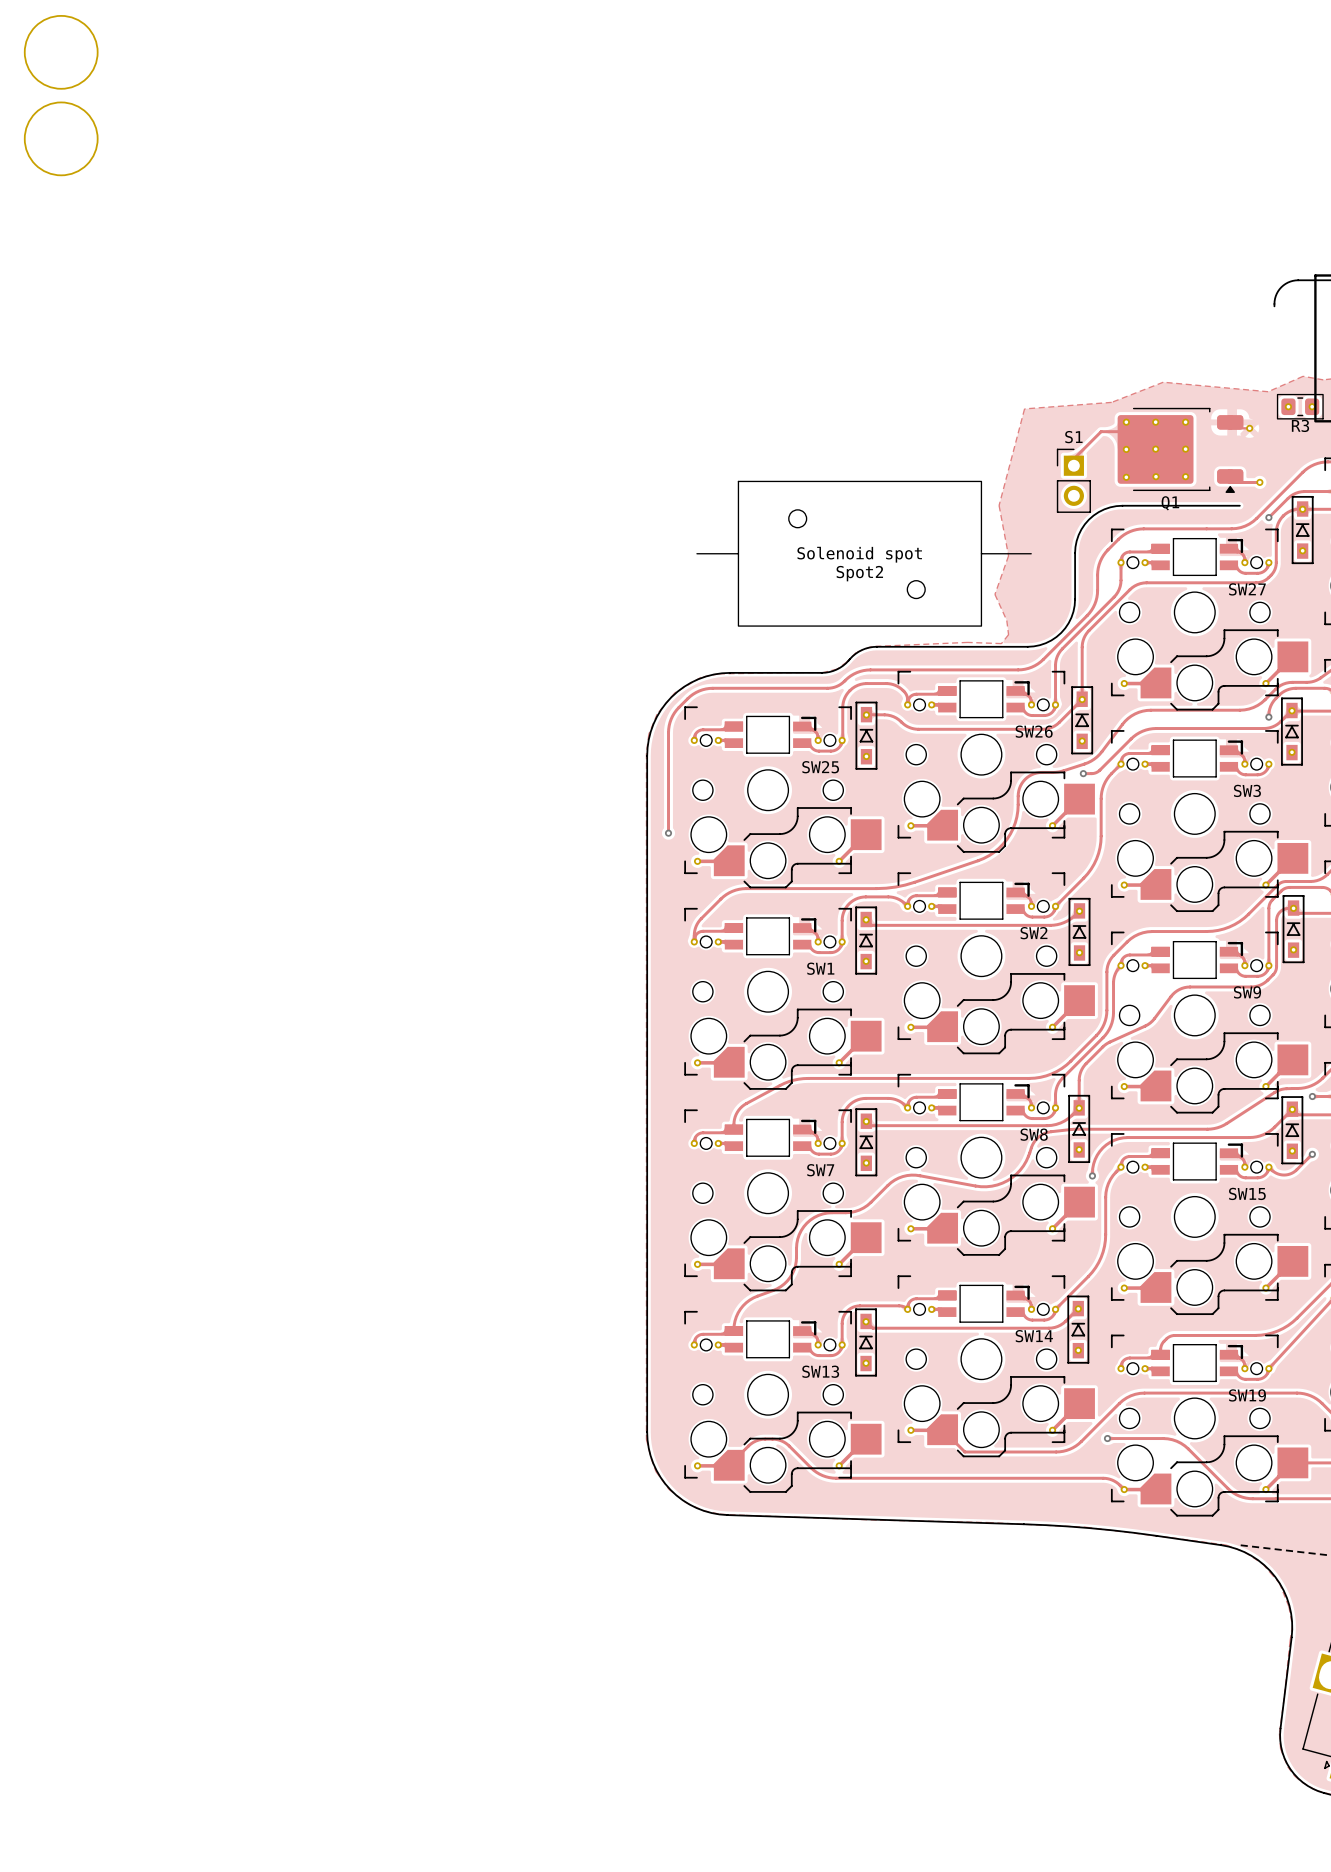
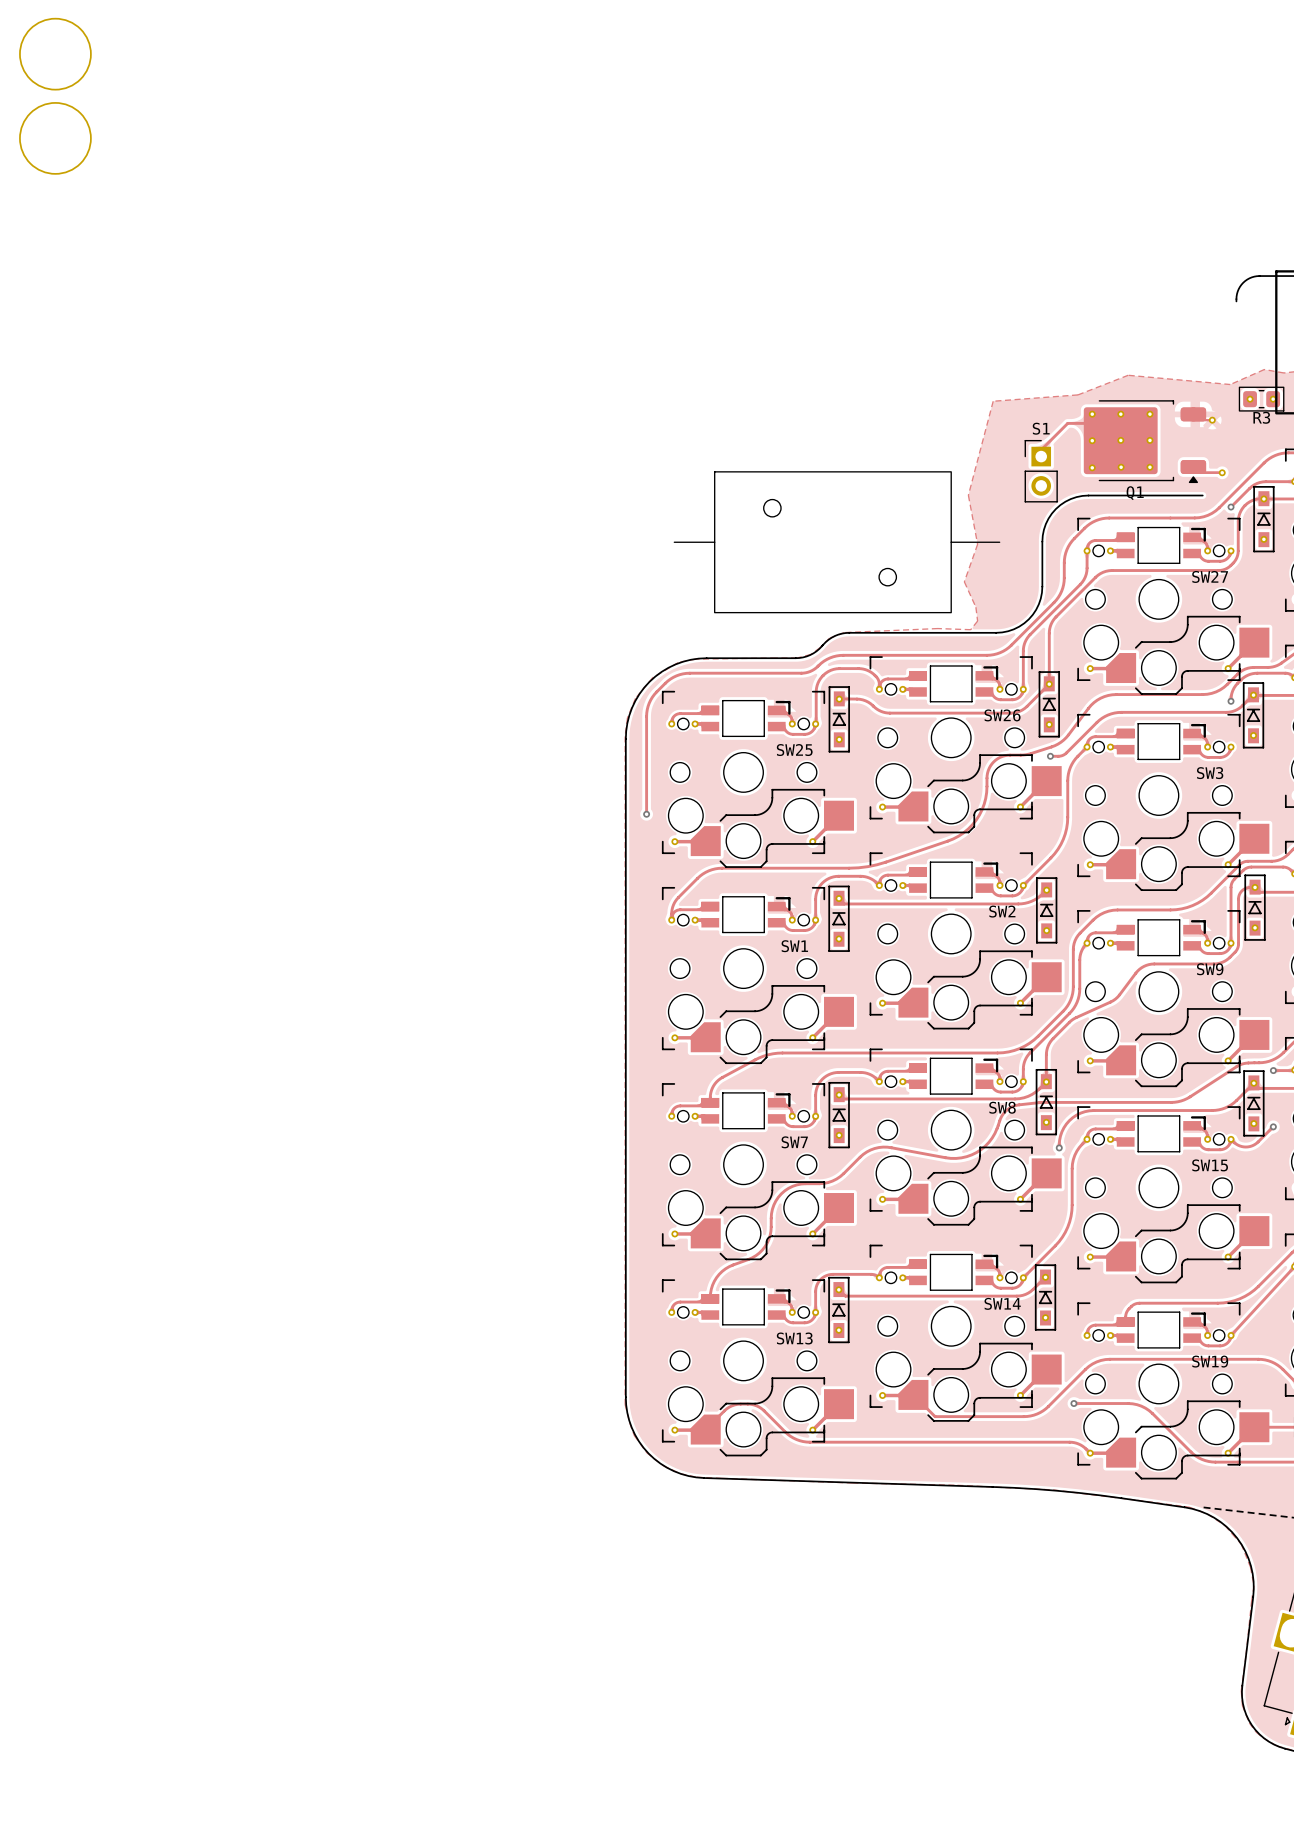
Spot2: Solenoid spot (864, 553) -> none

